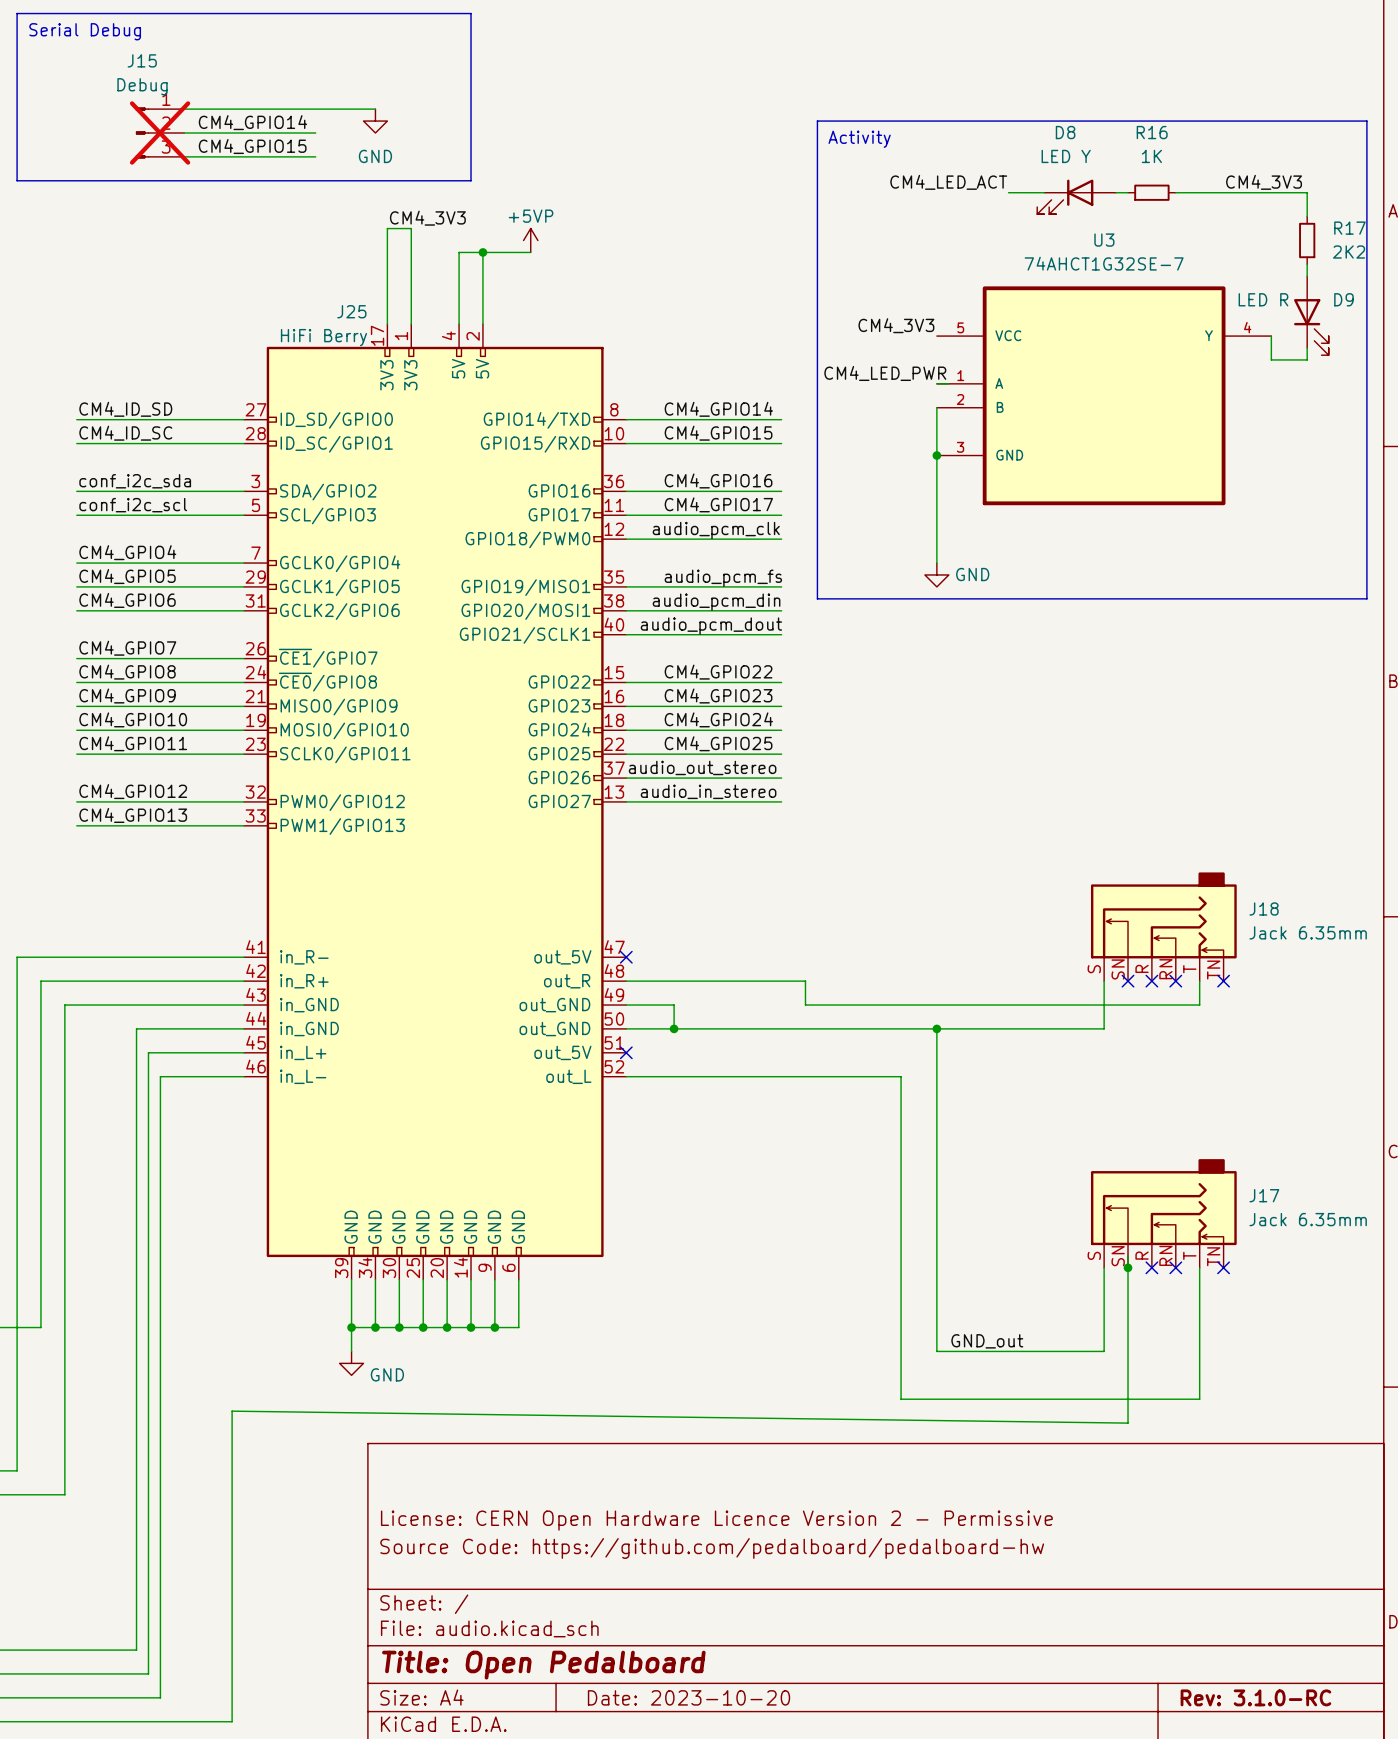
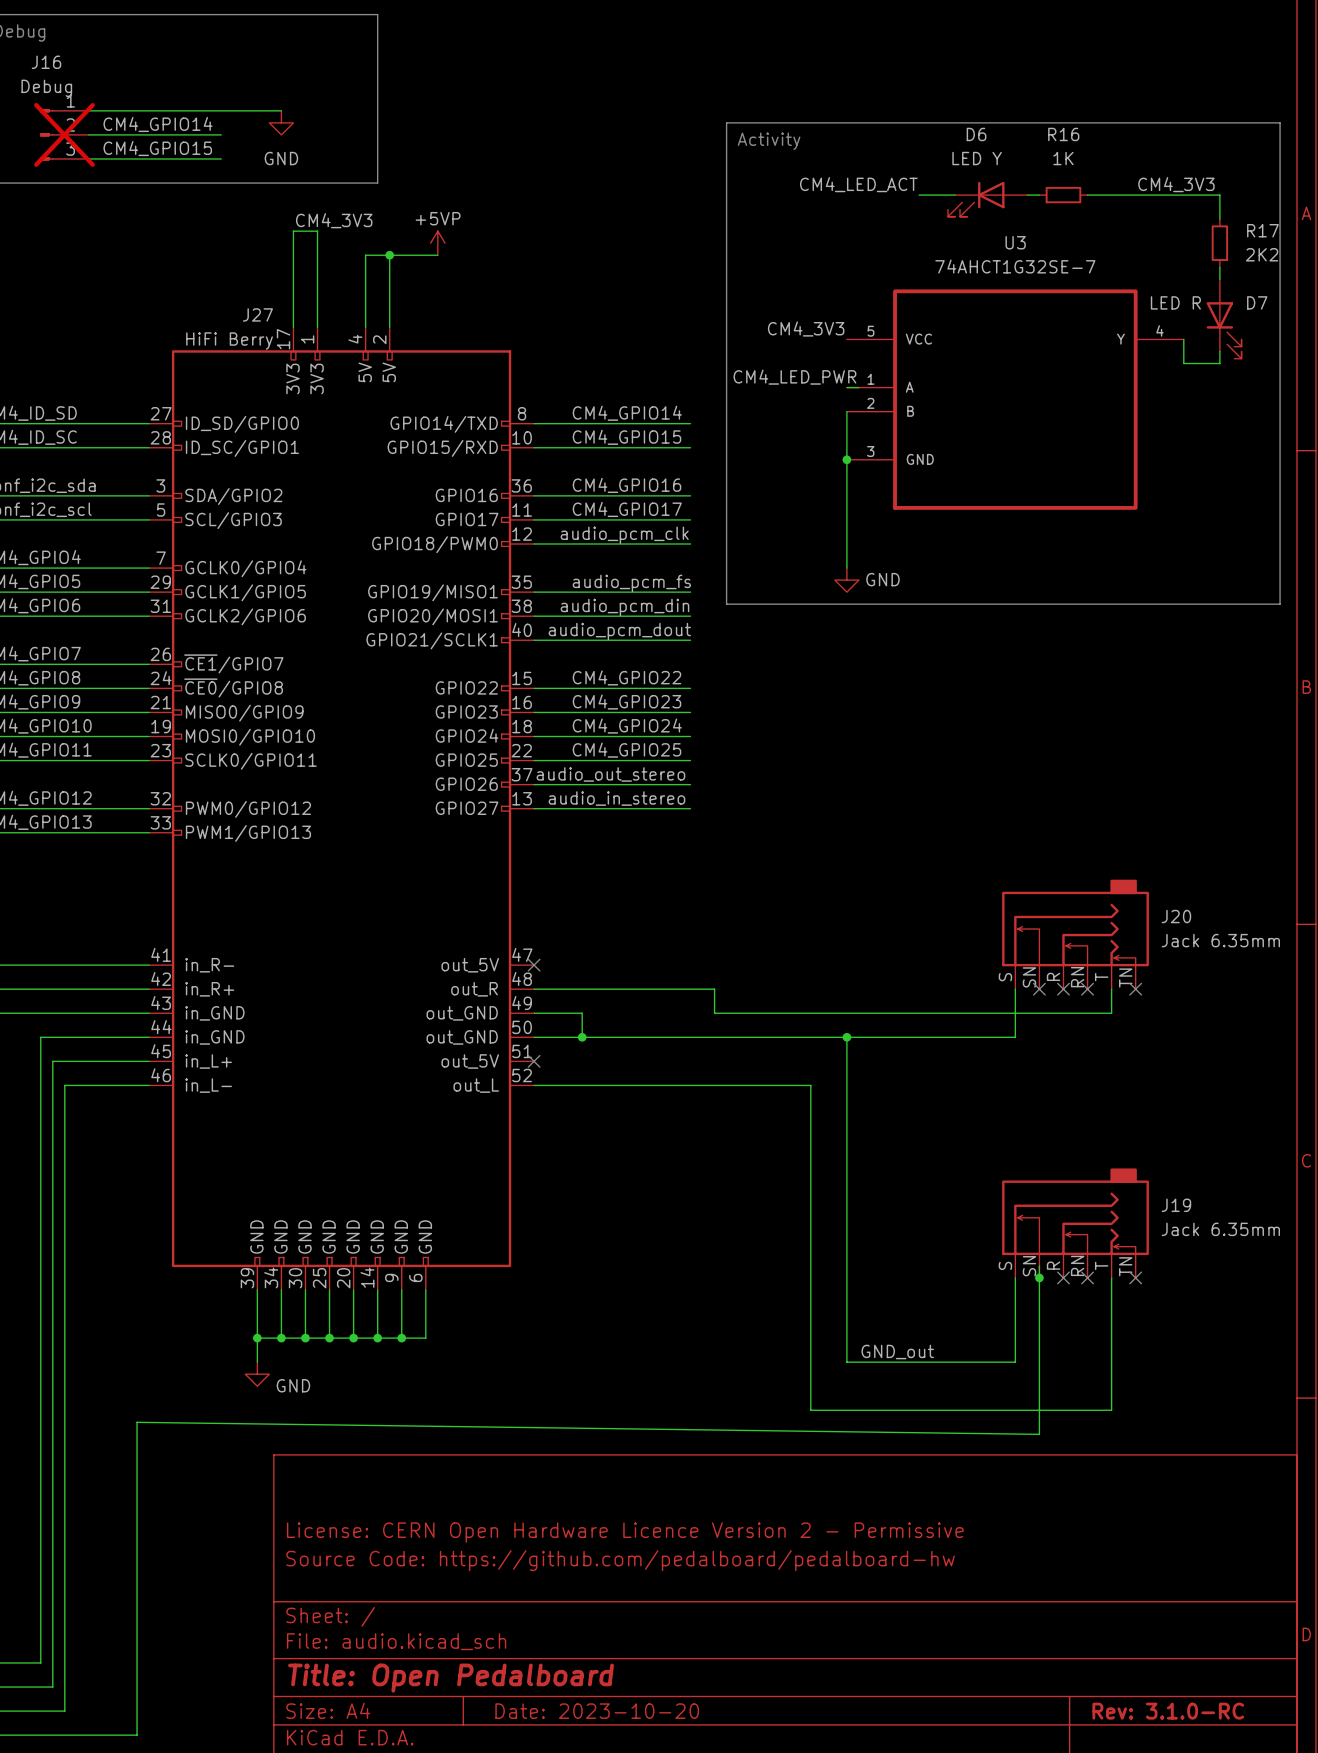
J15 name: J15 (142, 60) -> J16 (46, 62)
D8 name: D8 (1065, 132) -> D6 (976, 134)
D9 name: D9 (1343, 299) -> D7 (1257, 302)
J25 name: J25 (351, 311) -> J27 (257, 314)
J18 name: J18 (1264, 909) -> J20 (1176, 916)
J17 name: J17 (1264, 1195) -> J19 (1176, 1205)

